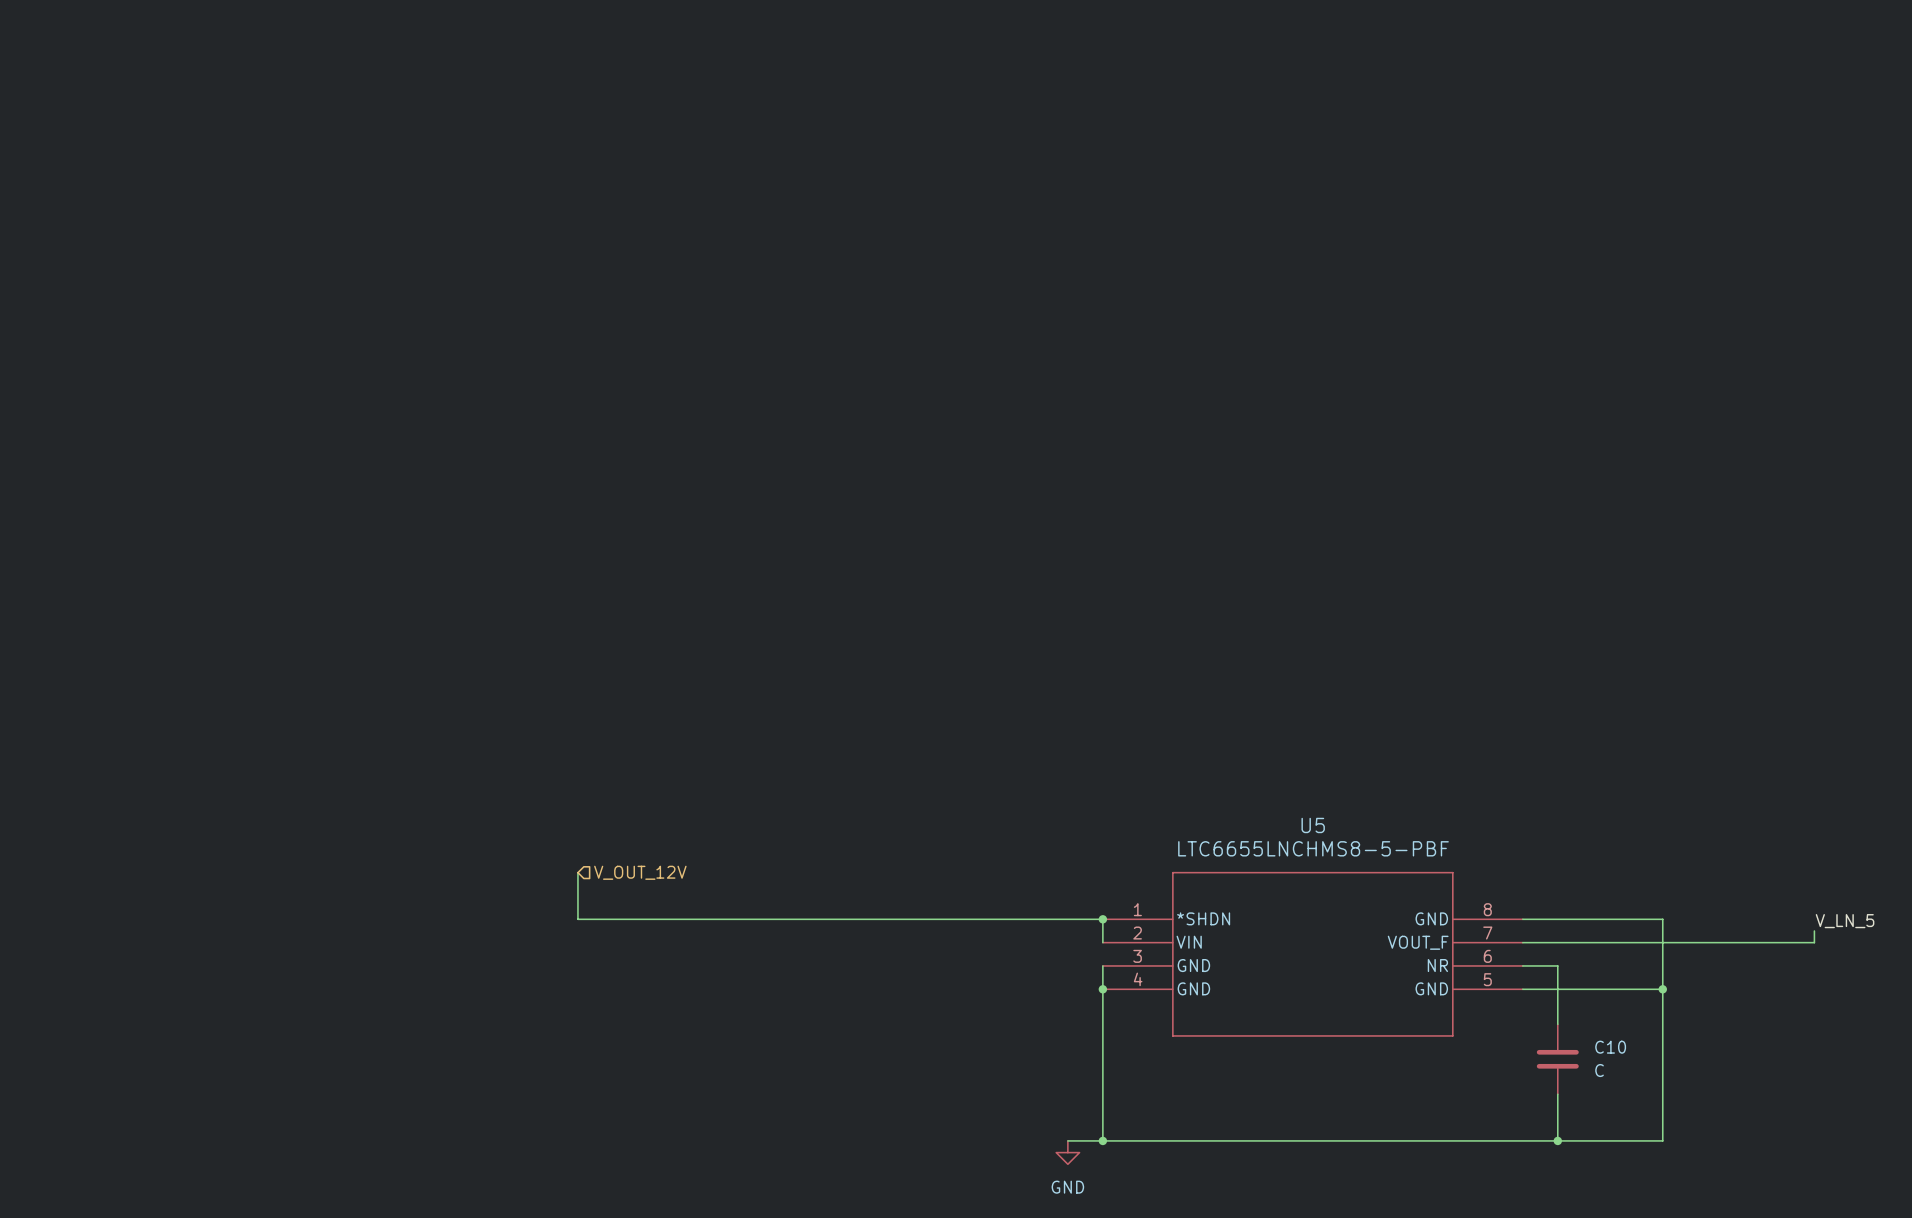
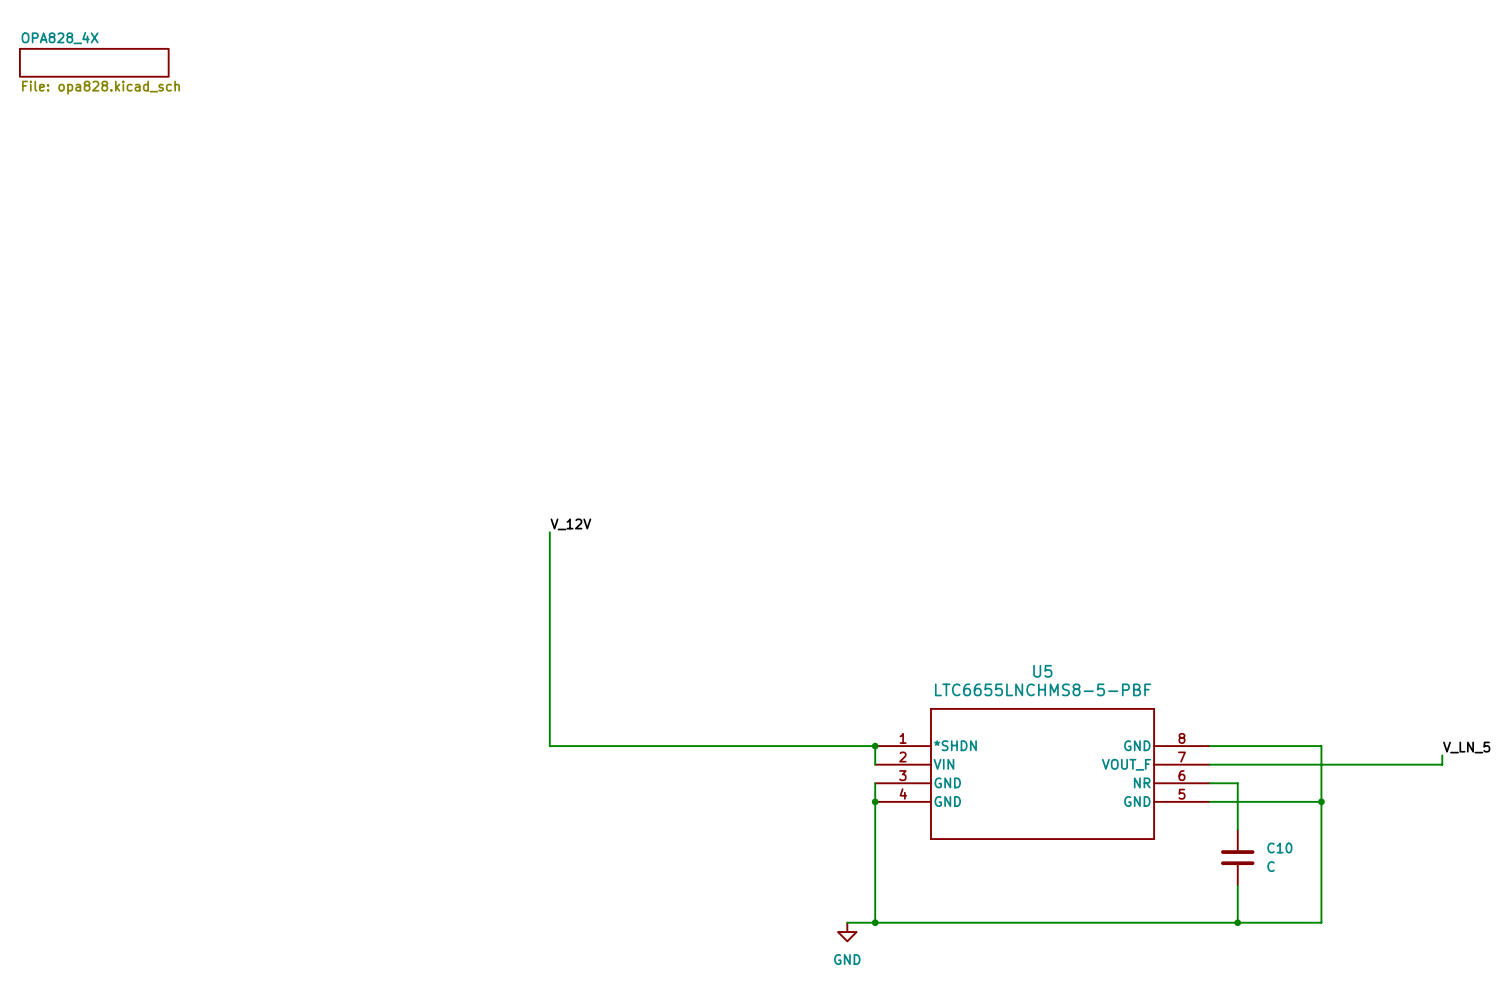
sheet OPA828_4X: none -> File: opa828.kicad_sch (94, 62)
label: none -> V_12V (570, 524)
wire: (577, 872) (577, 919) (694, 919) -> (549, 532) (549, 746)
hierarchical label: V_OUT_12V (640, 872) -> none

